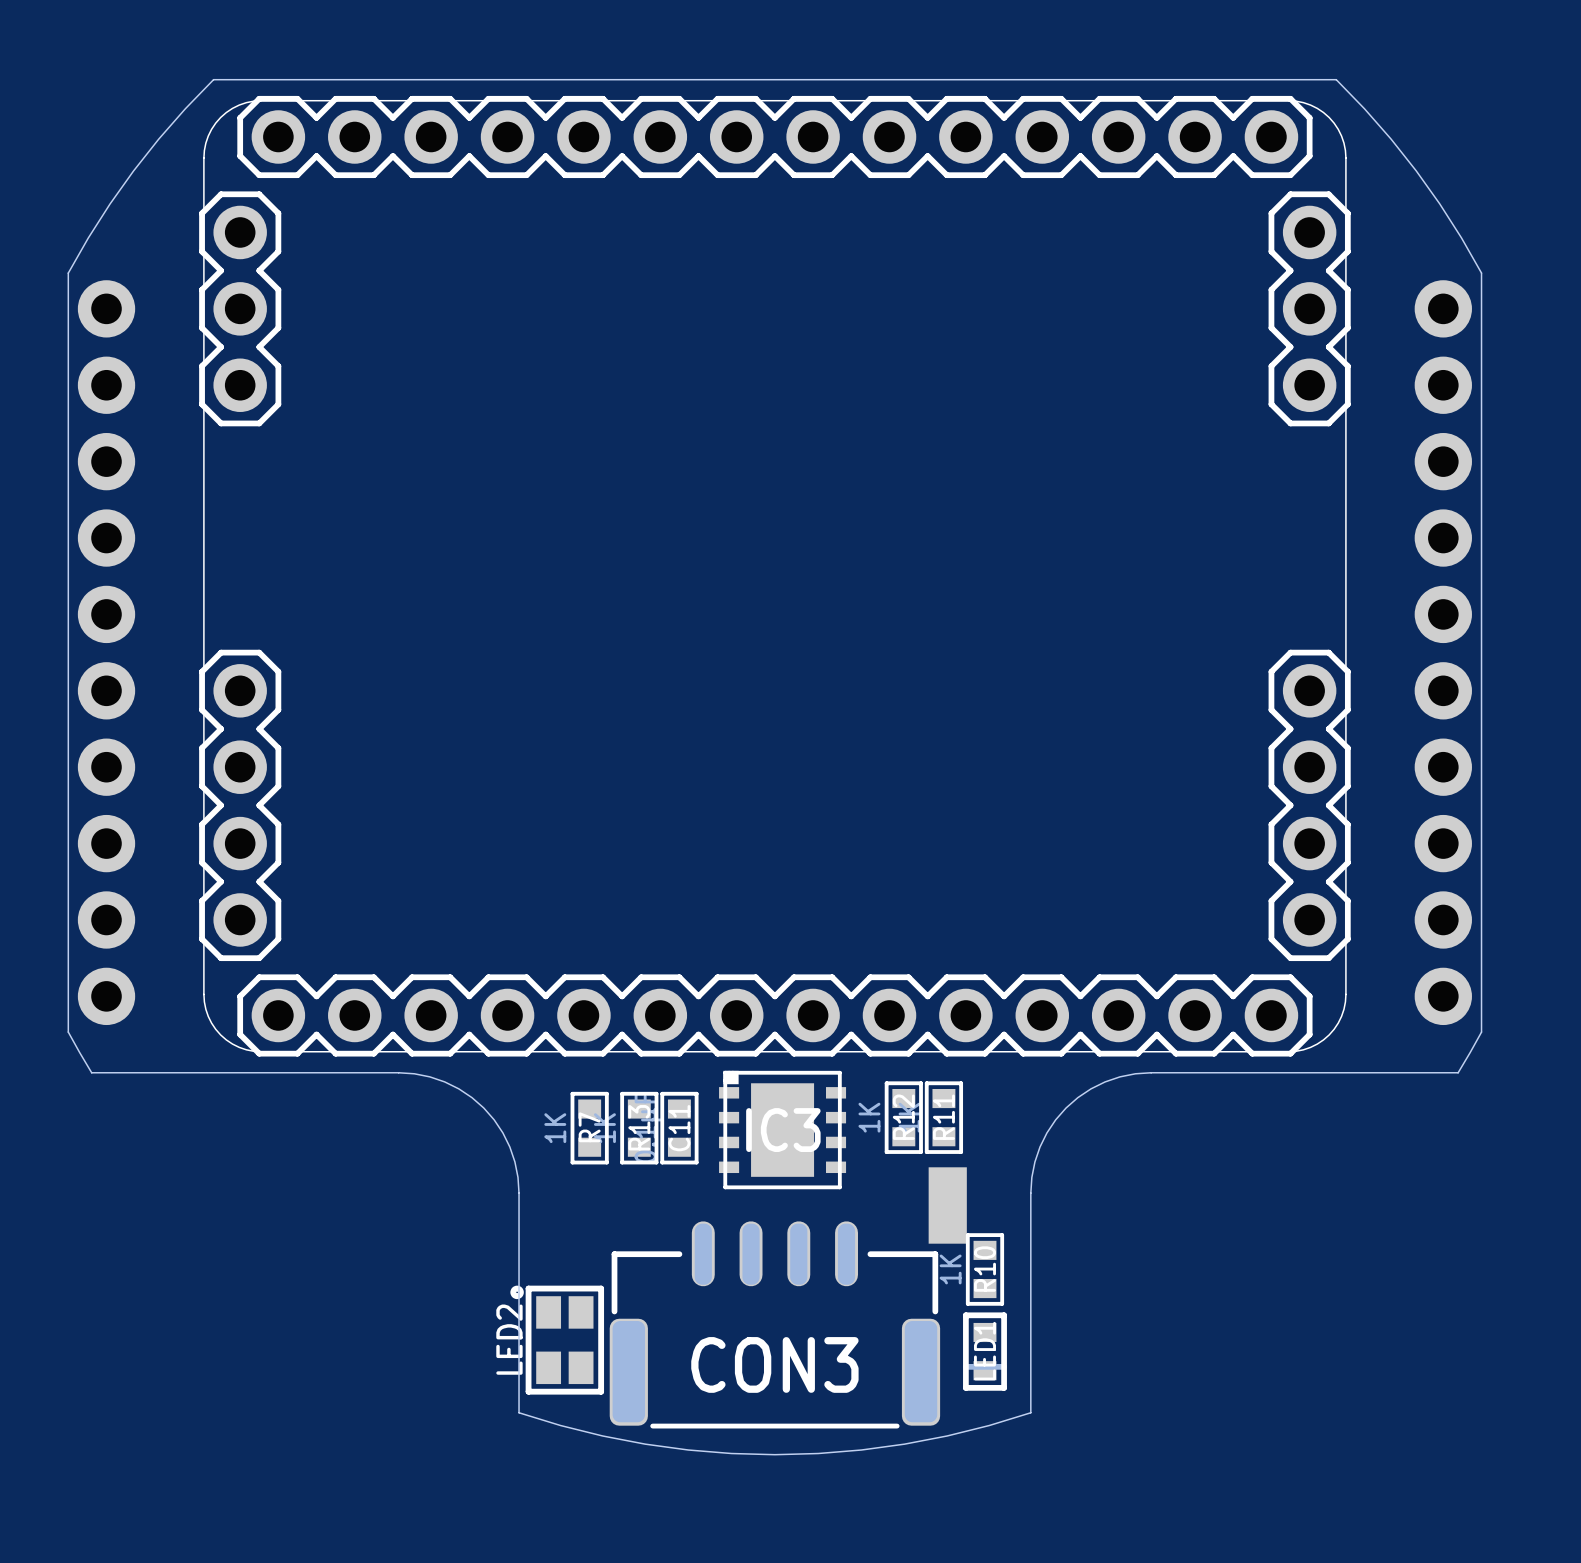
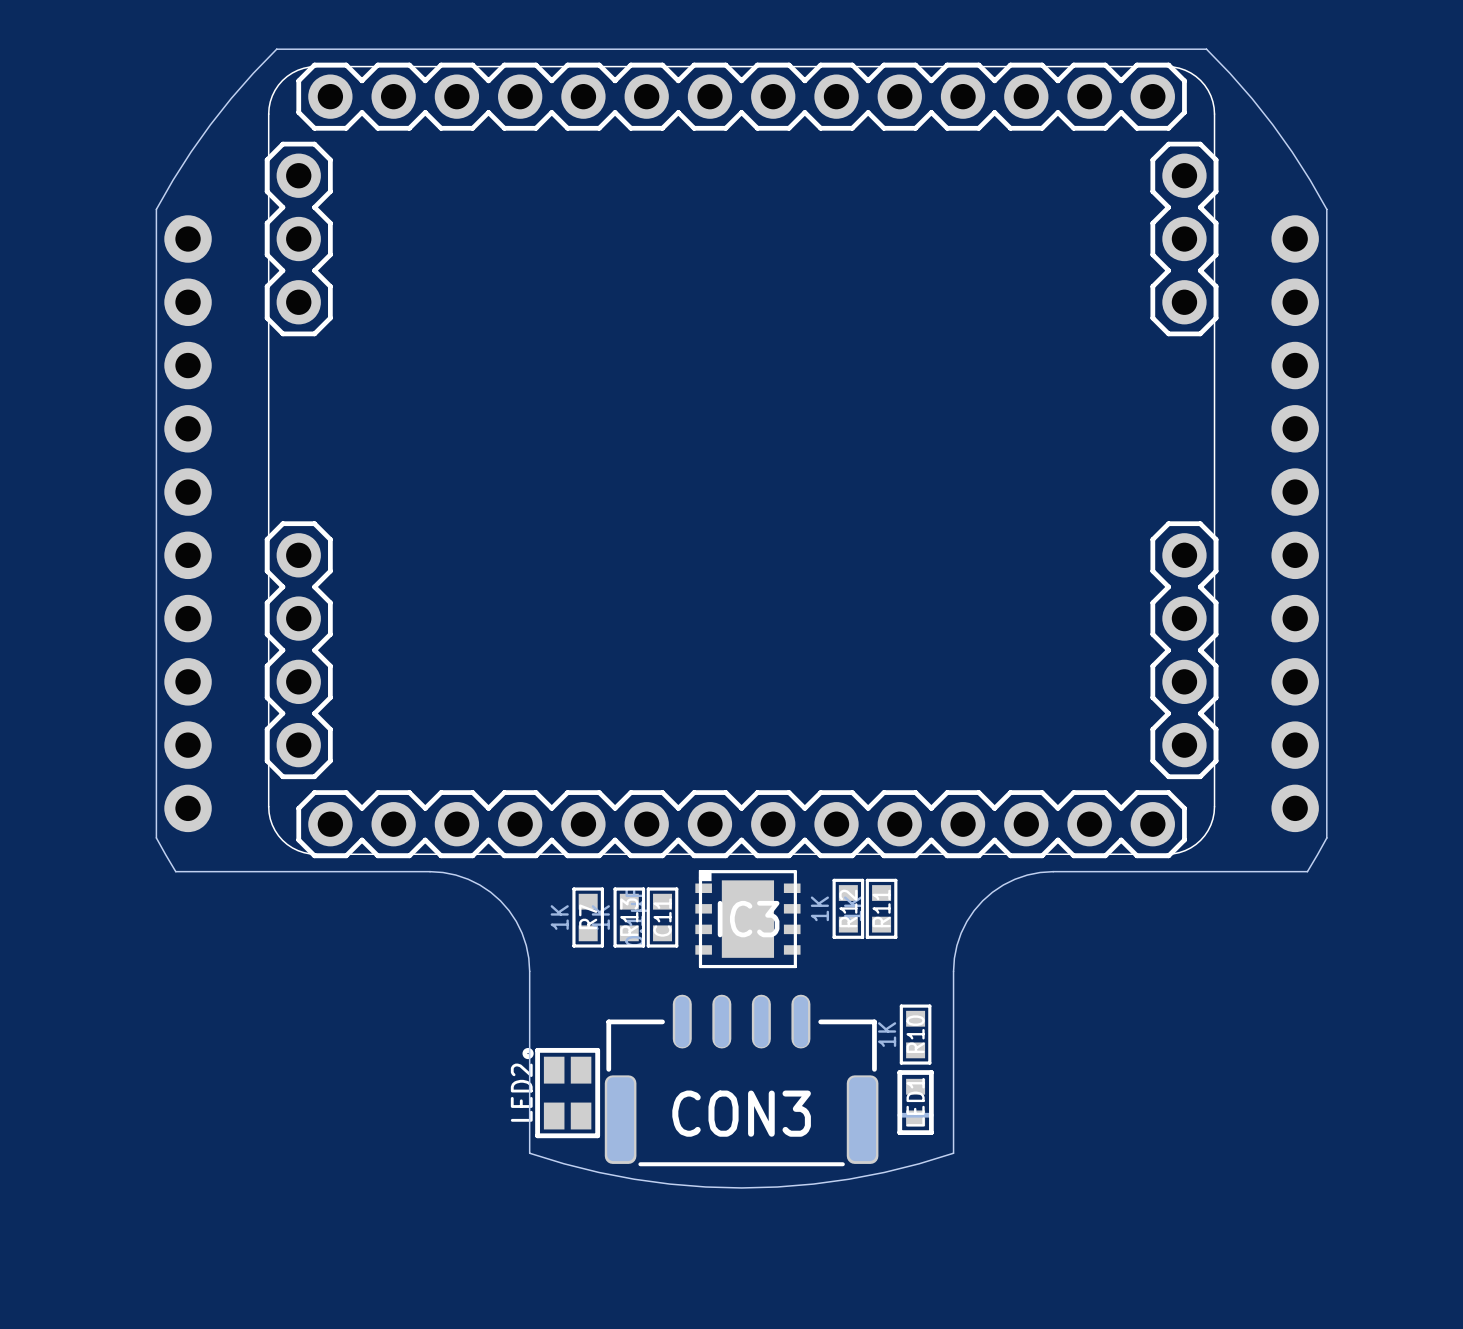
part: (947, 1205) -> none

